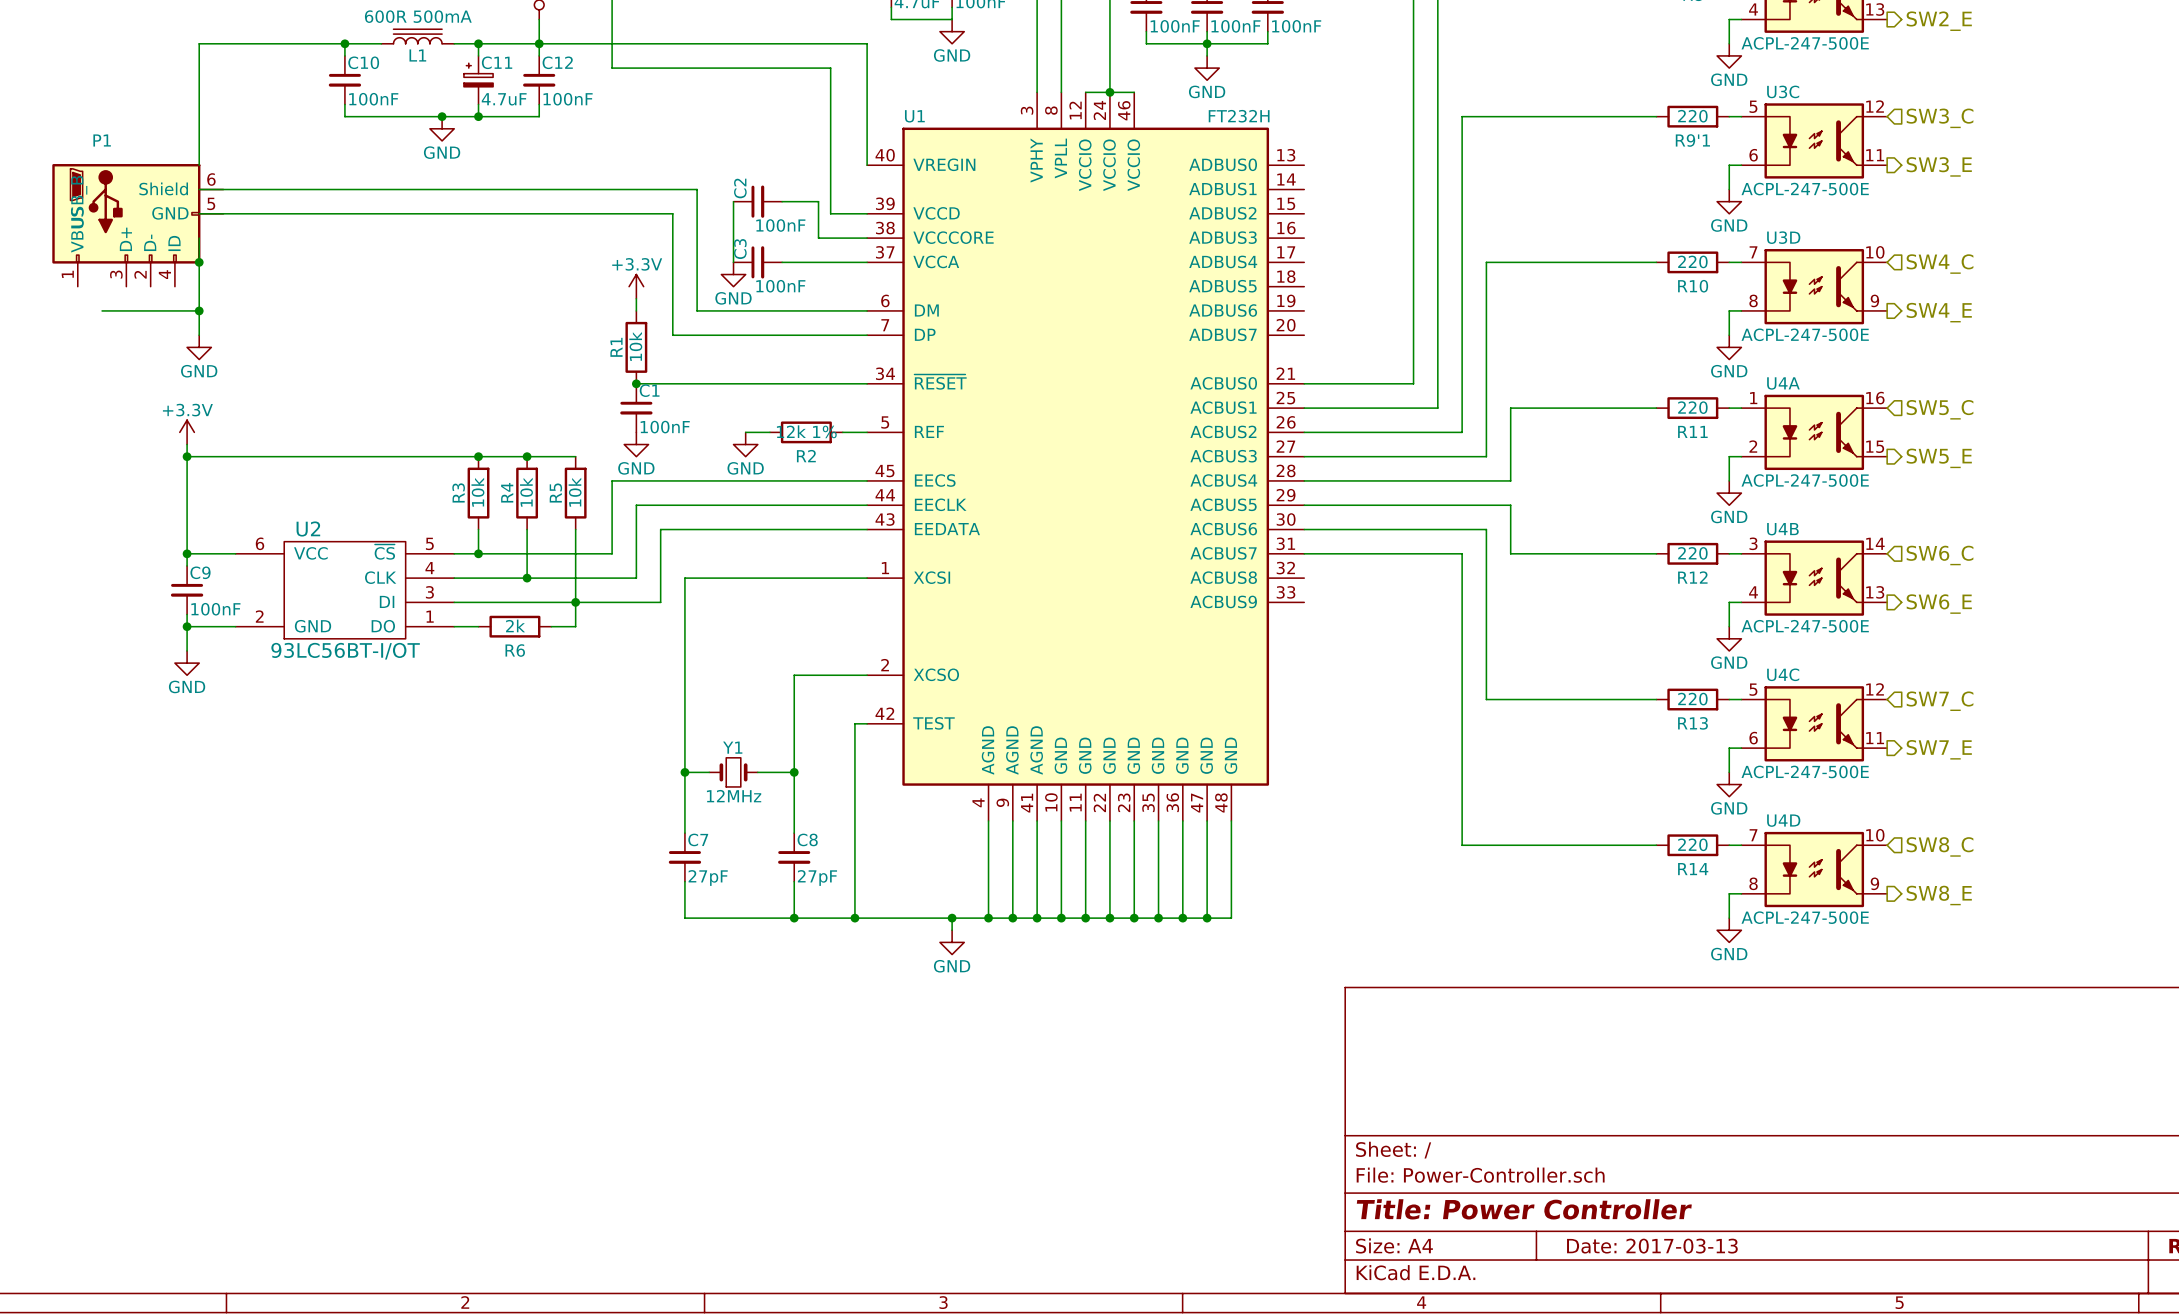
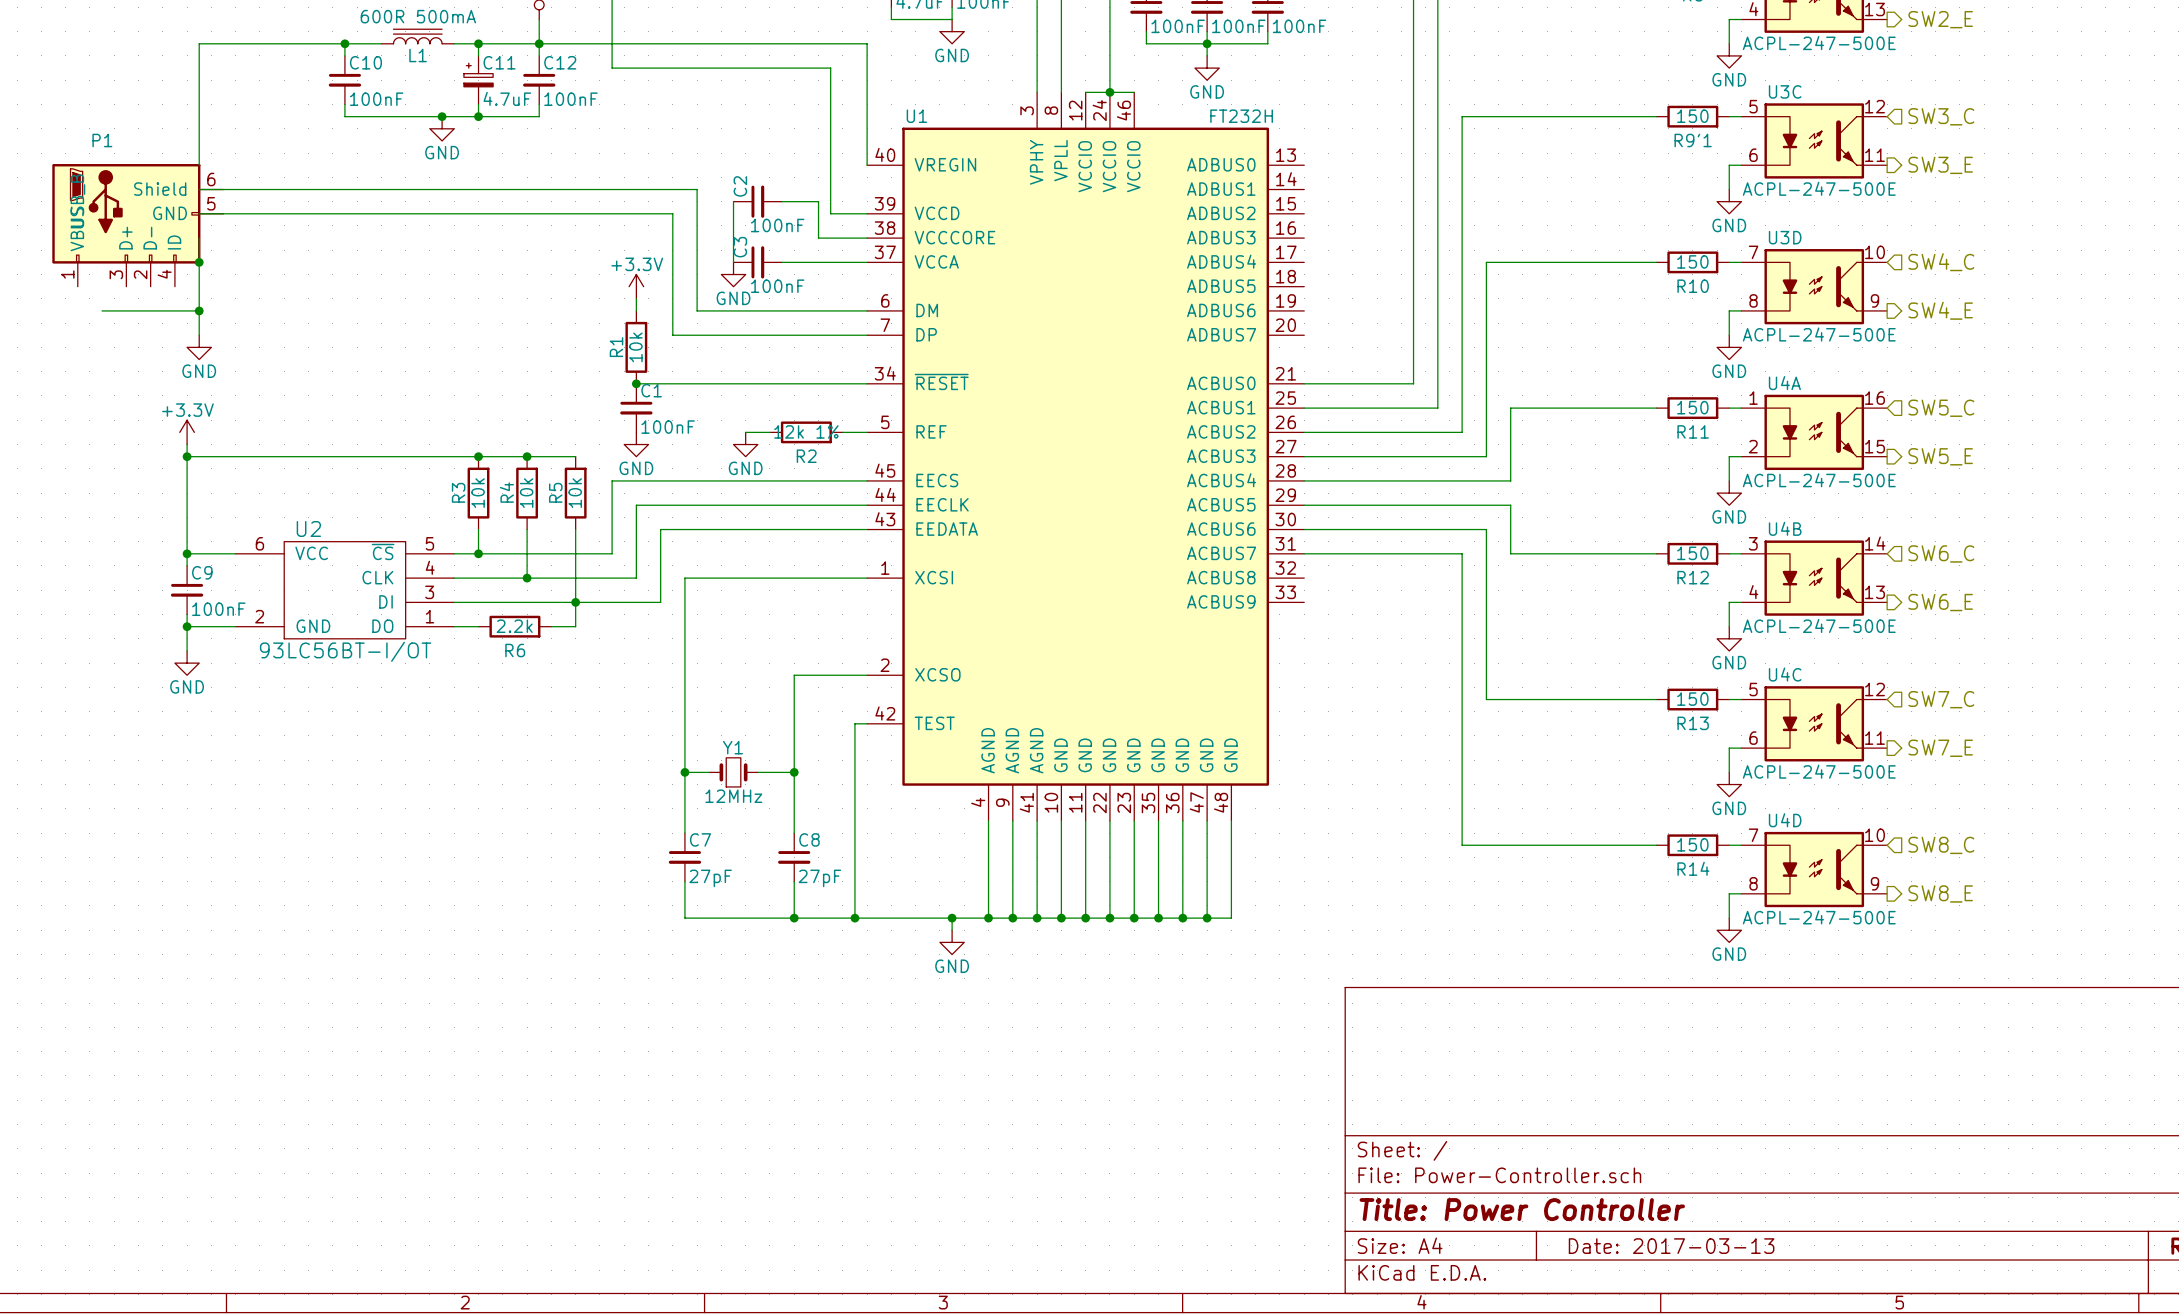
R9'1 value: 220 (1692, 116) -> 150 (1692, 116)
R10 value: 220 (1692, 261) -> 150 (1692, 261)
R11 value: 220 (1692, 407) -> 150 (1692, 407)
R12 value: 220 (1692, 553) -> 150 (1692, 553)
R6 value: 2k (515, 625) -> 2.2k (514, 626)
R13 value: 220 (1692, 699) -> 150 (1692, 699)
R14 value: 220 (1692, 844) -> 150 (1692, 844)

